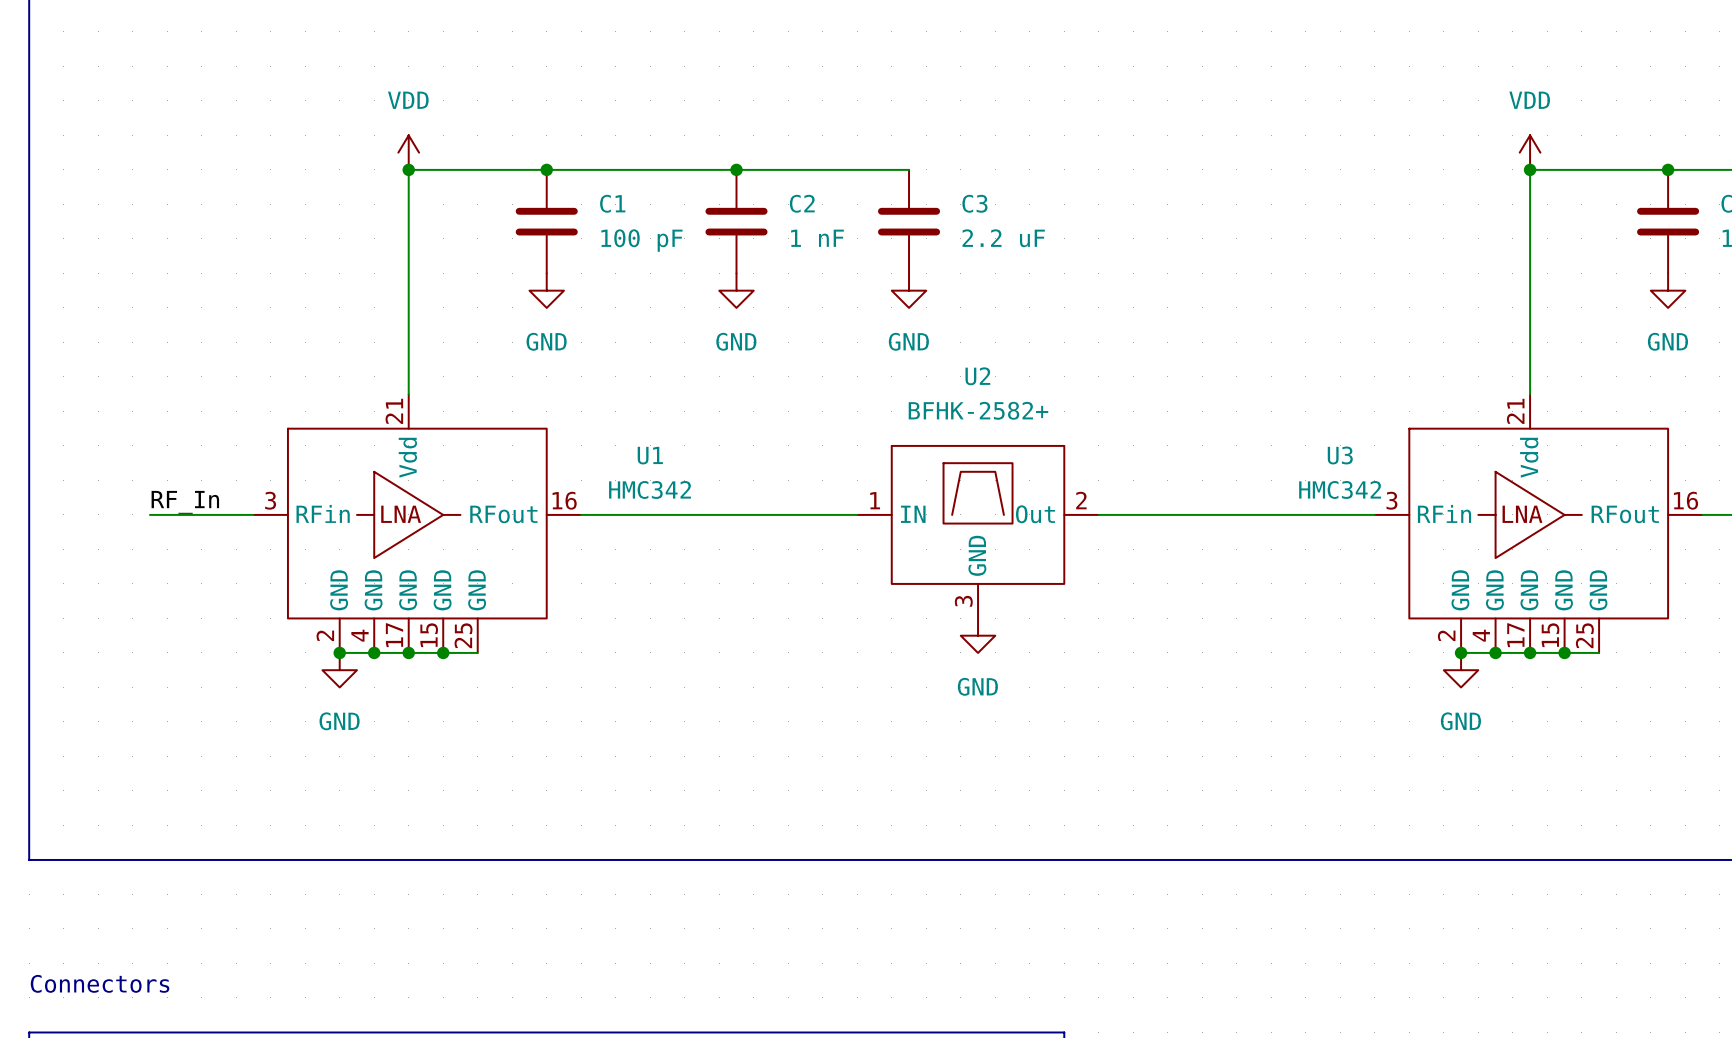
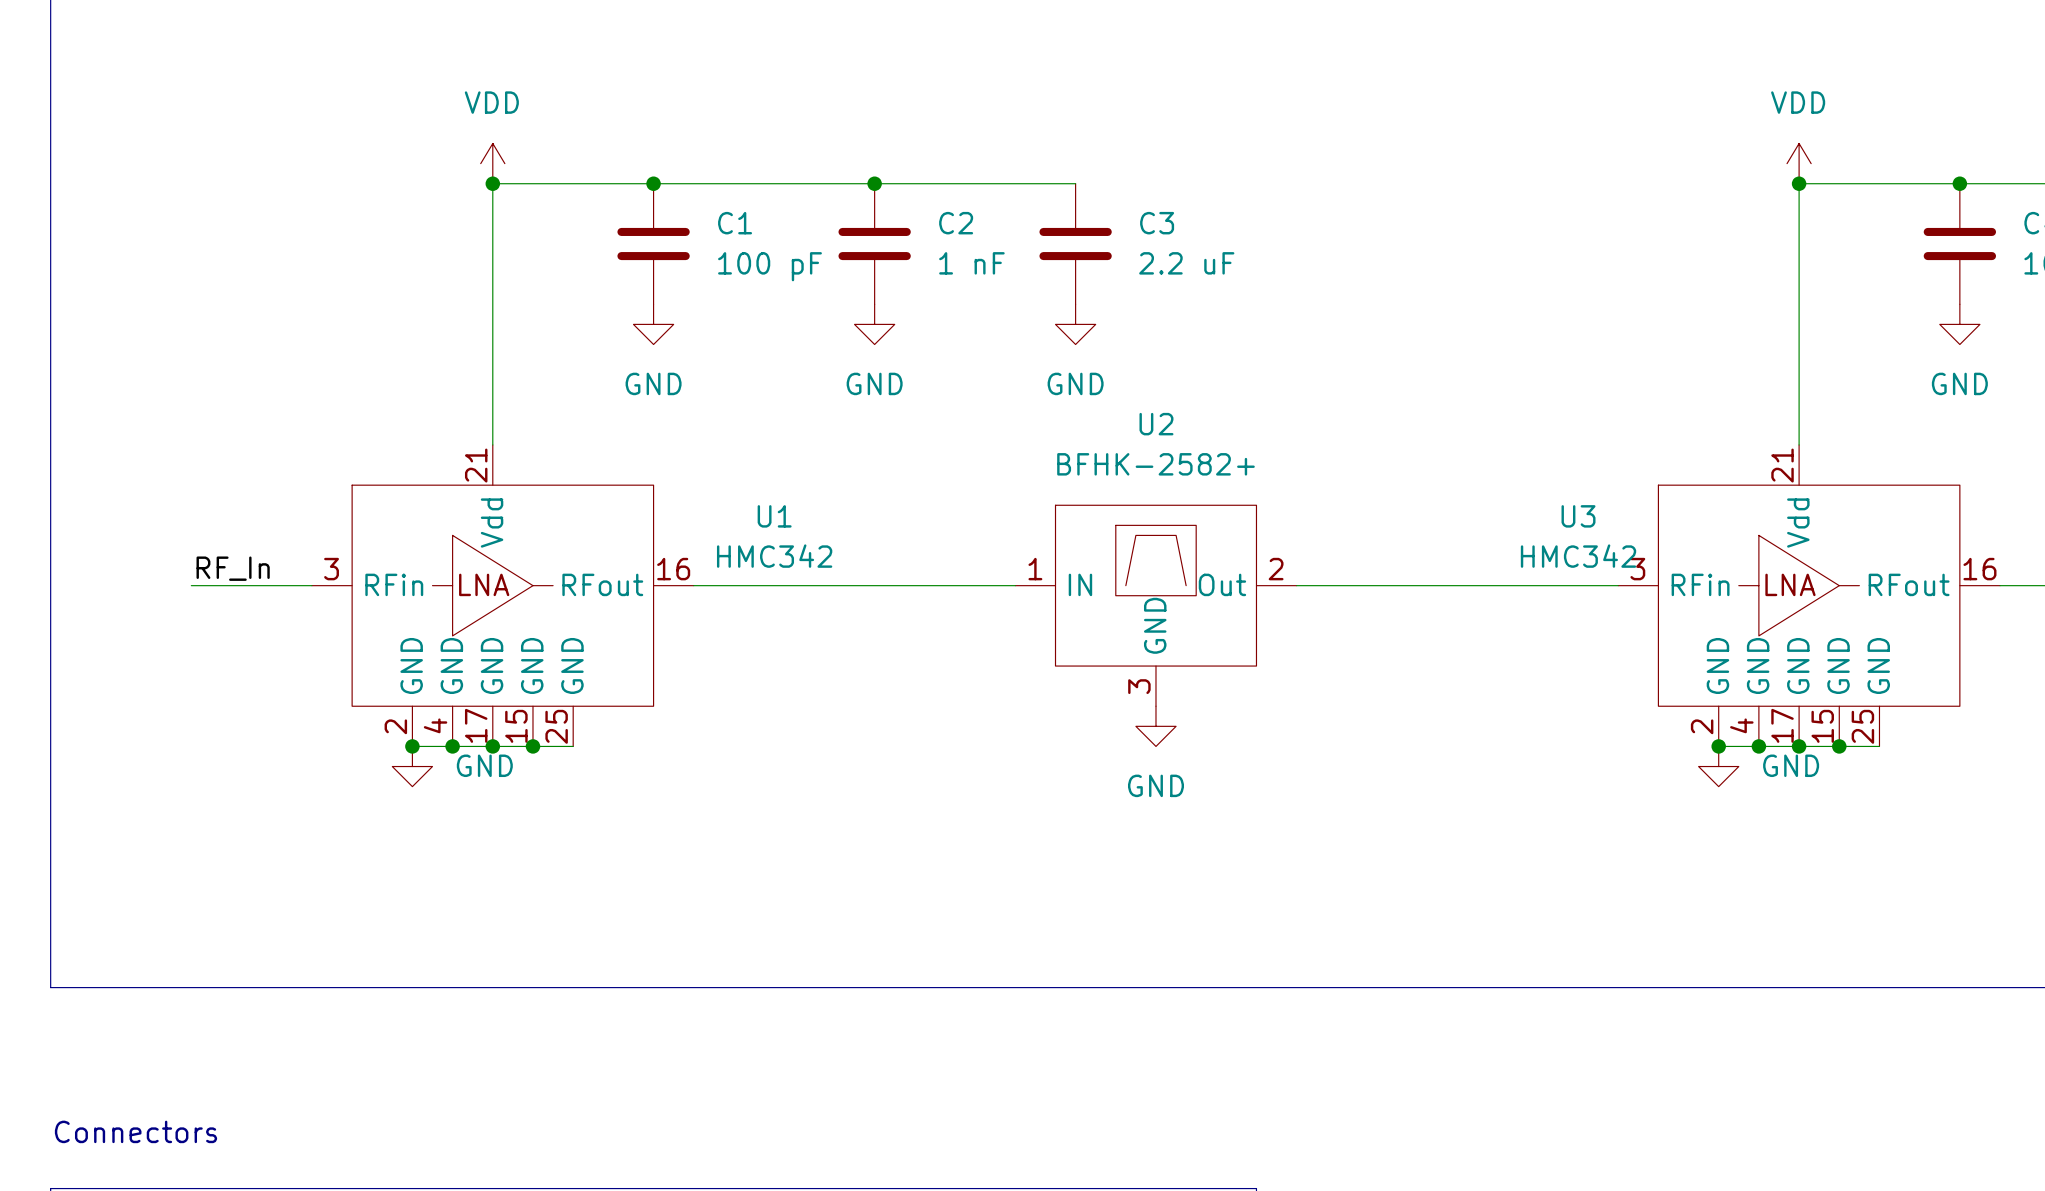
power symbol text position: GND (339, 721) -> GND (484, 765)
power symbol text position: GND (1460, 721) -> GND (1791, 765)

